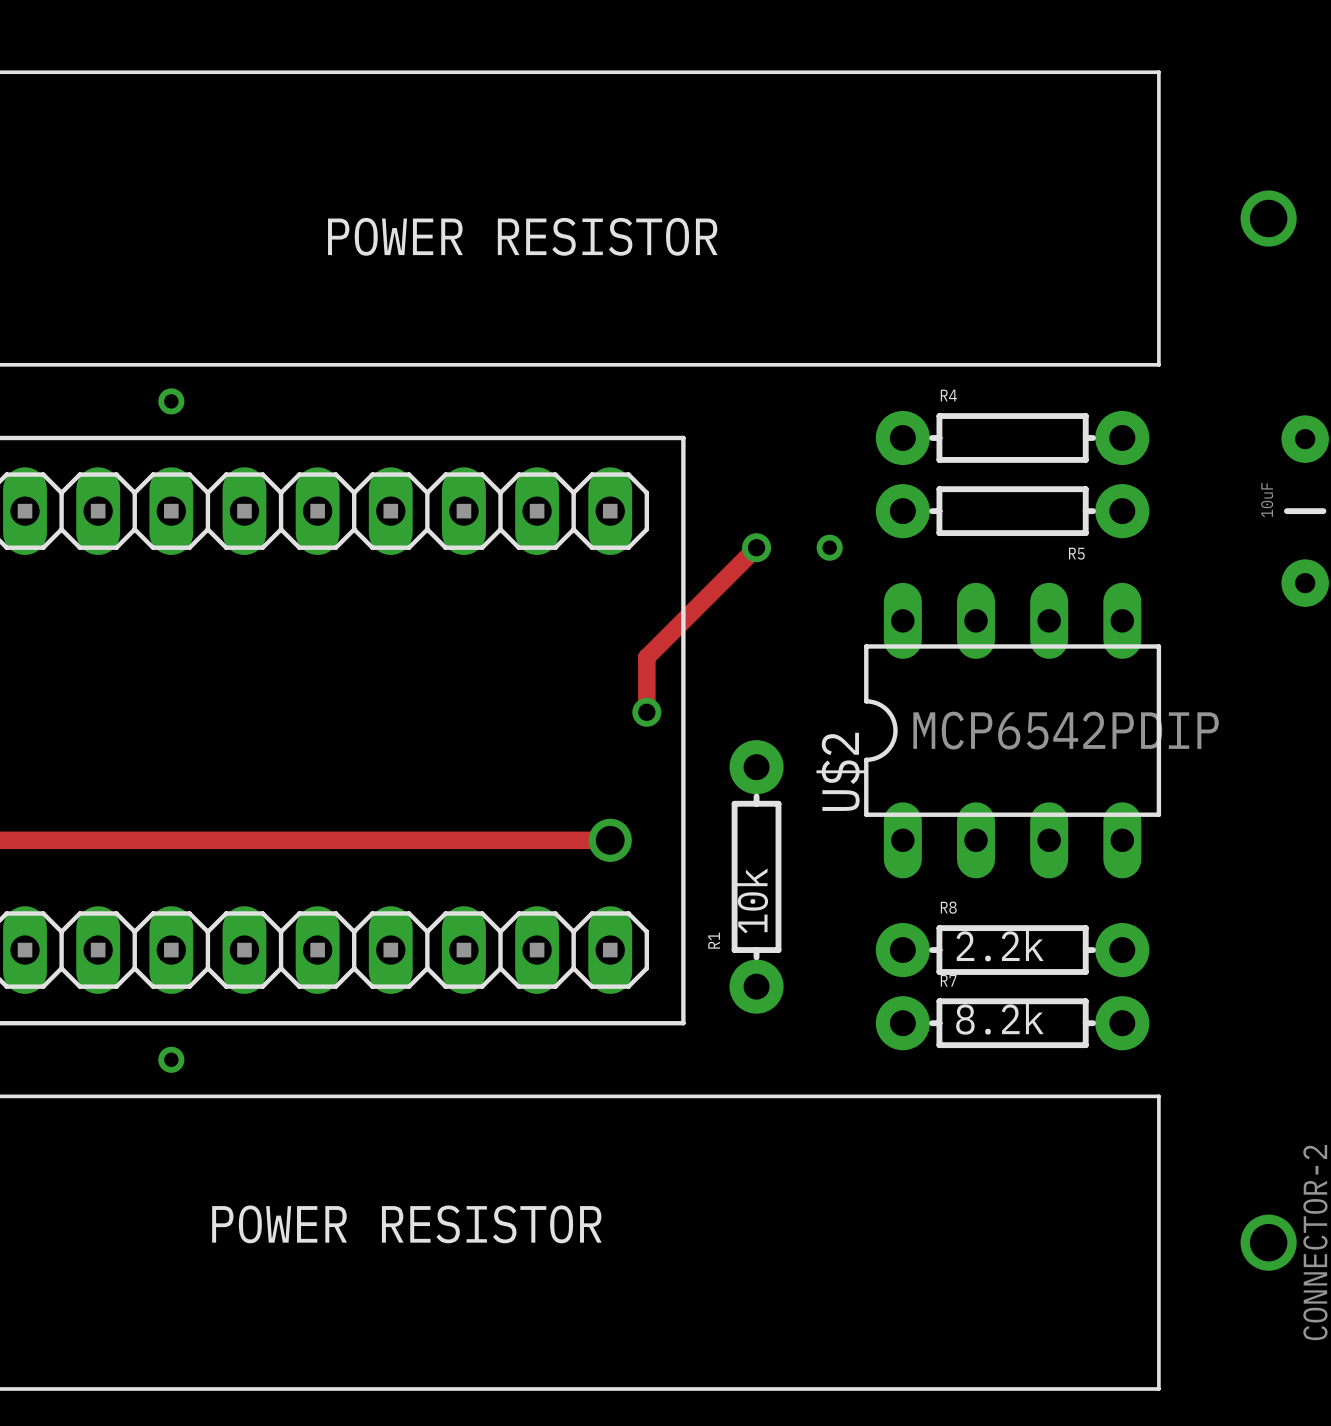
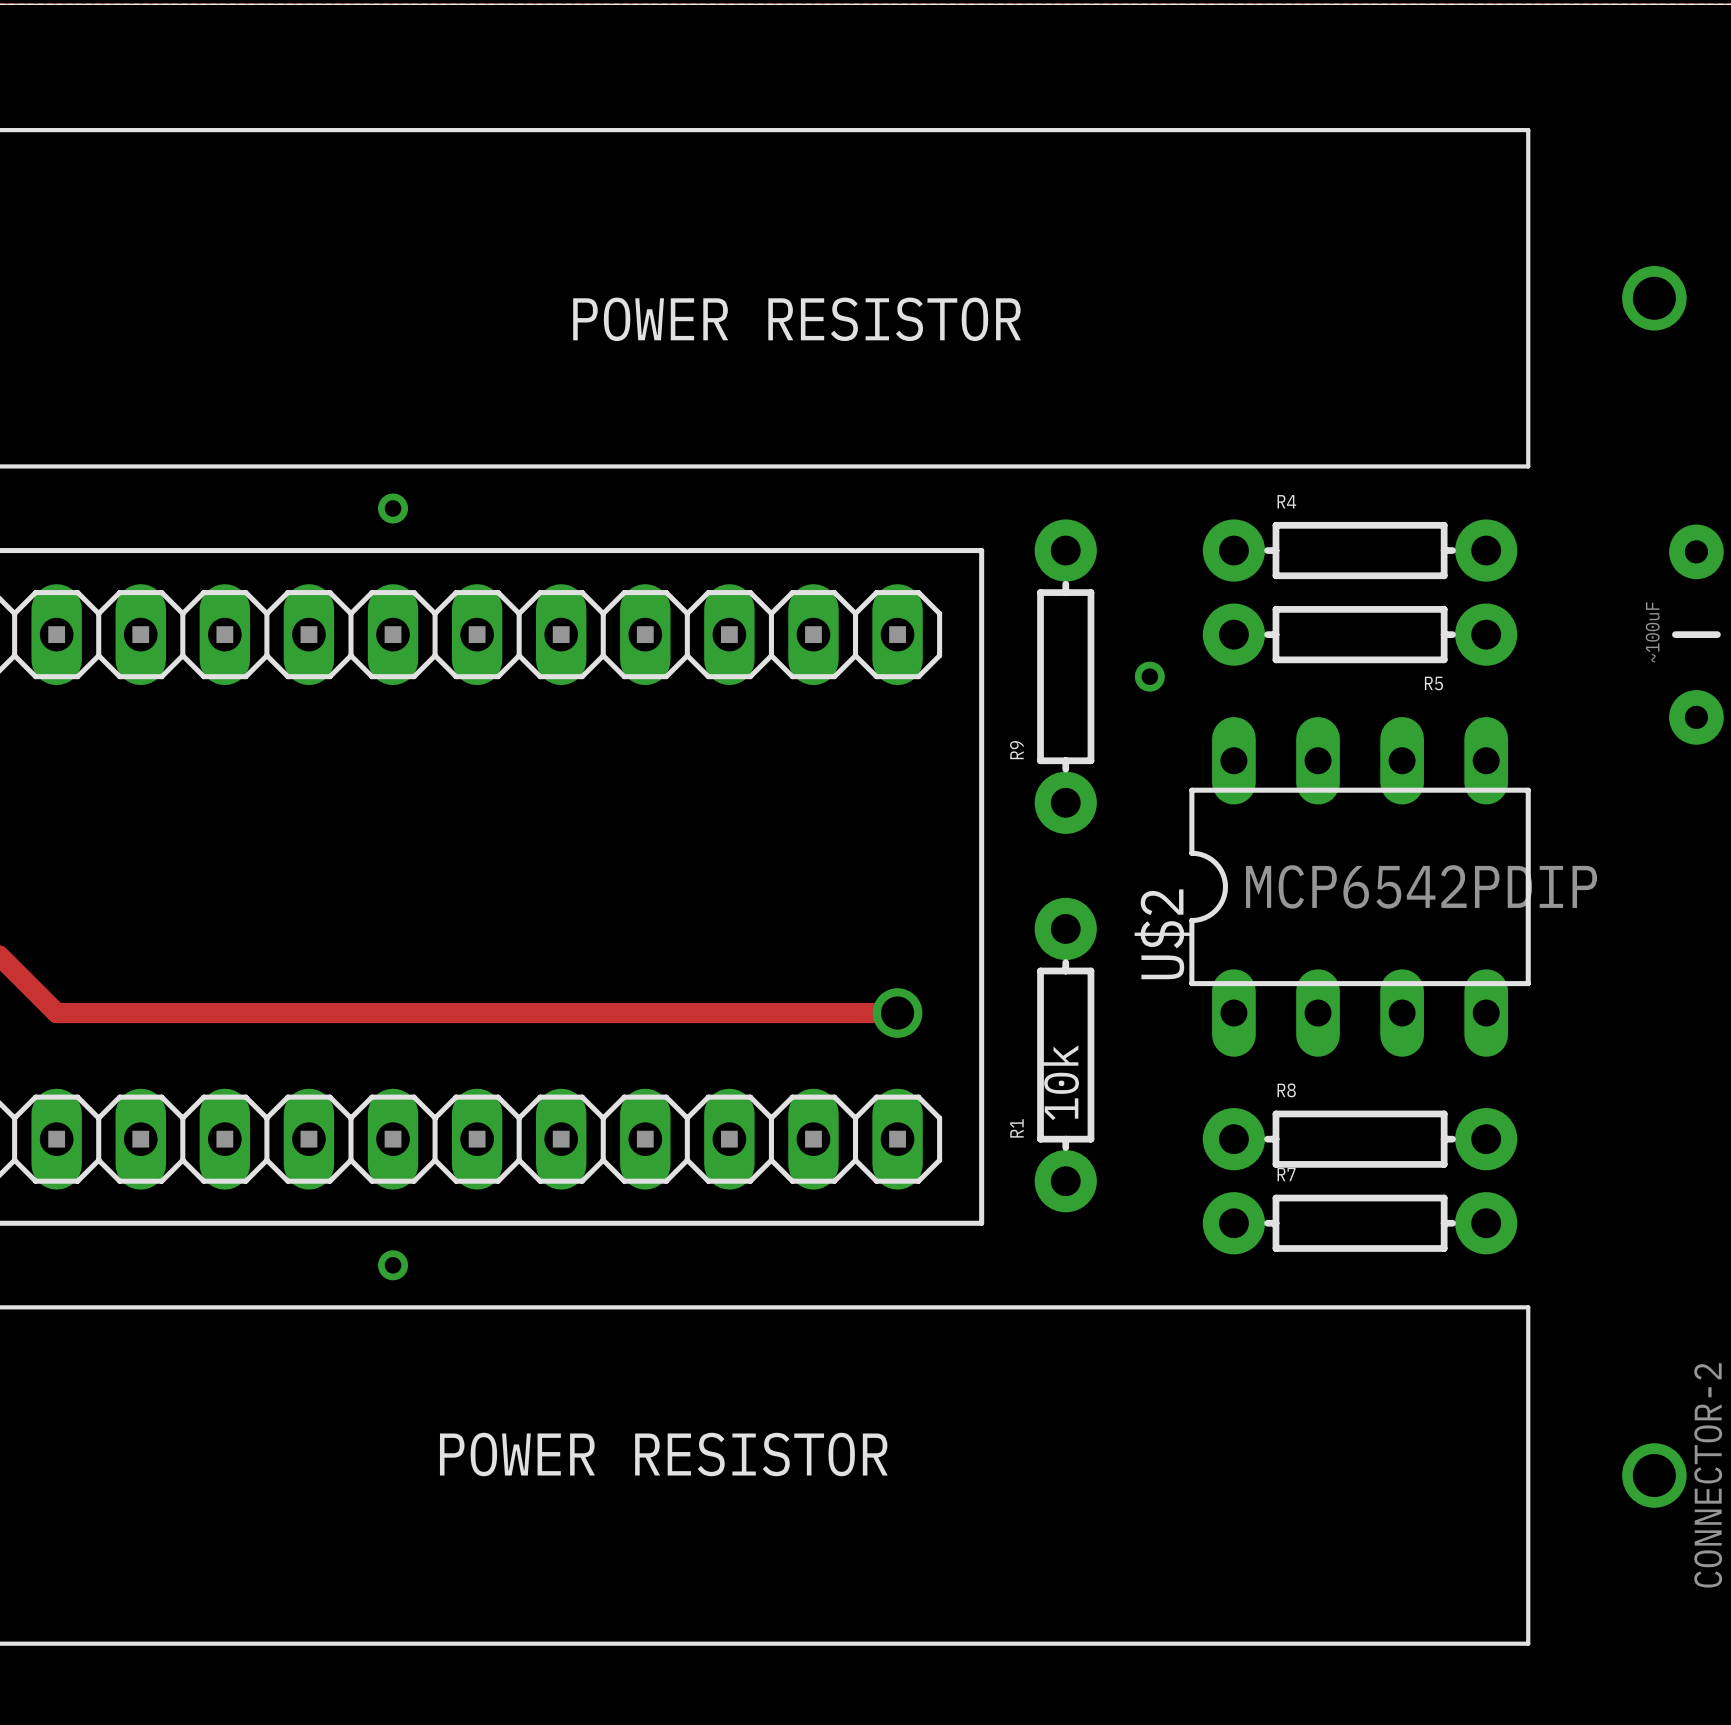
part value: 10uF (1267, 500) -> ~100uF (1652, 632)
track: (756, 547) (646, 657) (646, 712) -> none
R9: none -> (1065, 676)
via: (756, 547) -> none
via: (646, 712) -> none
R8 value: 2.2k (1000, 945) -> none
R7 value: 8.2k (999, 1018) -> none

